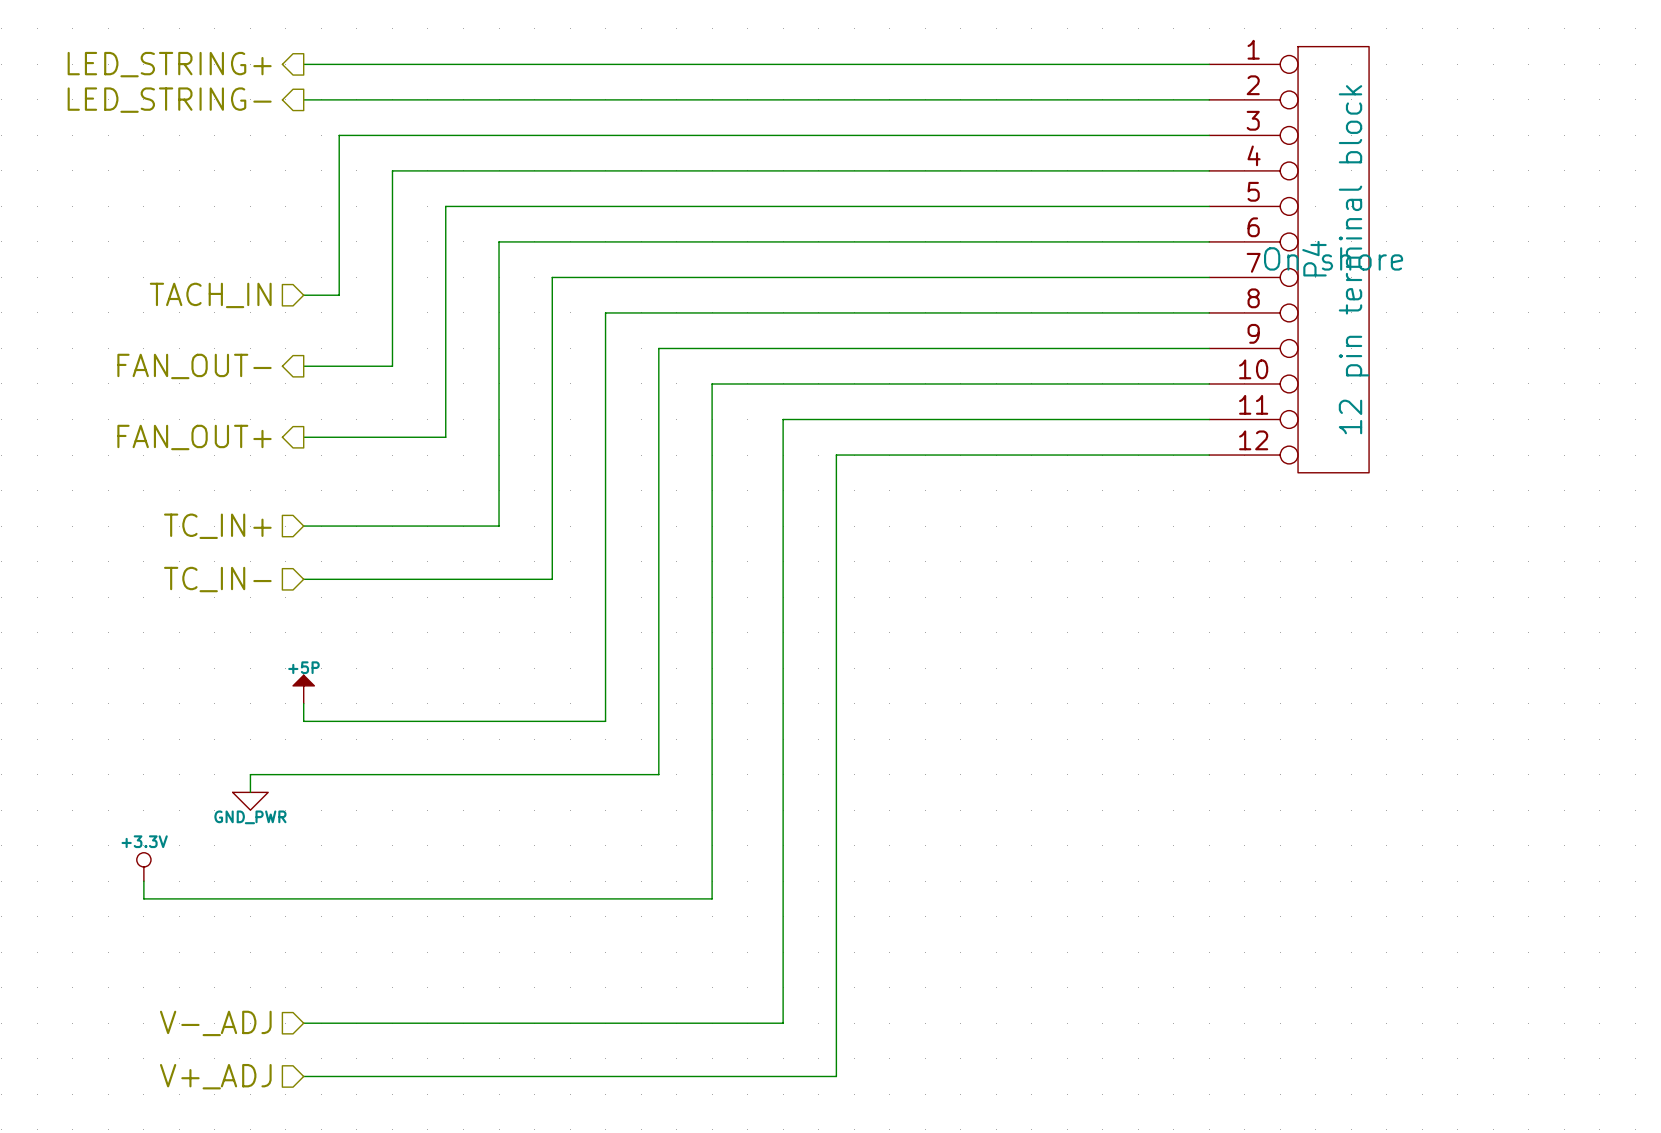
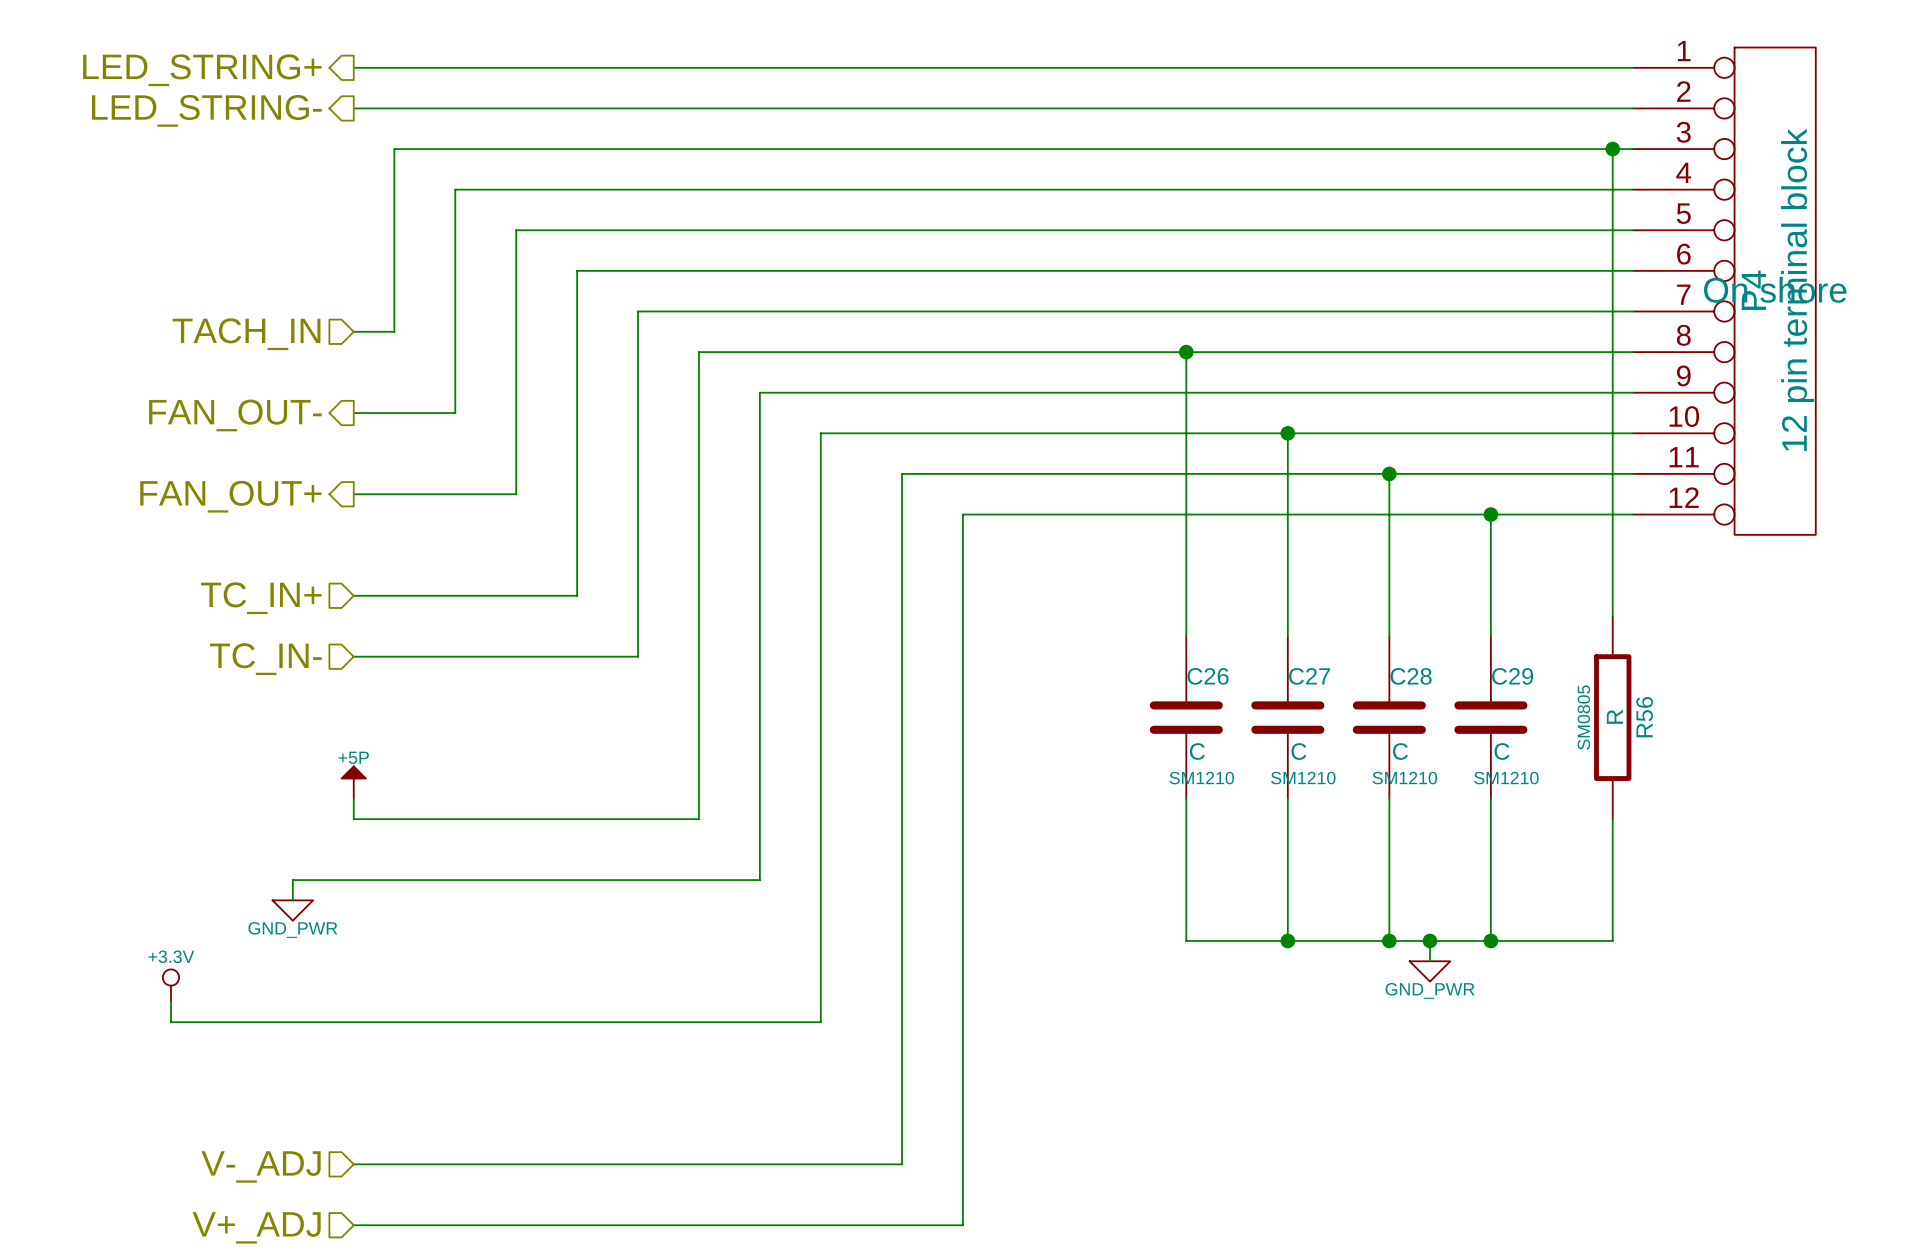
wire: none -> (1389, 67) (1633, 67)
wire: none -> (1389, 108) (1633, 108)
wire: none -> (1389, 149) (1633, 149)
wire: none -> (1612, 149) (1612, 616)
junction: none -> (1612, 149)
wire: none -> (1389, 189) (1633, 189)
wire: none -> (1389, 230) (1633, 230)
wire: none -> (1389, 270) (1633, 270)
P4 position: (1289, 259) -> (1724, 291)
wire: none -> (1389, 311) (1633, 311)
wire: none -> (1186, 352) (1186, 636)
junction: none -> (1186, 352)
wire: none -> (1389, 352) (1633, 352)
wire: none -> (1389, 392) (1633, 392)
wire: none -> (1287, 433) (1287, 636)
junction: none -> (1287, 433)
wire: none -> (1389, 433) (1633, 433)
junction: none -> (1389, 473)
wire: none -> (1633, 473) (1389, 473) (1389, 636)
wire: none -> (1389, 514) (1633, 514)
wire: none -> (1490, 514) (1490, 636)
junction: none -> (1490, 514)
C26: none -> C (1186, 717)
C27: none -> C (1287, 717)
C28: none -> C (1389, 717)
C29: none -> C (1490, 717)
R56: none -> R (1612, 717)
wire: none -> (1186, 798) (1186, 940) (1612, 940) (1612, 819)
wire: none -> (1287, 798) (1287, 940)
wire: none -> (1389, 798) (1389, 940)
wire: none -> (1490, 798) (1490, 940)
junction: none -> (1287, 940)
junction: none -> (1389, 940)
wire: none -> (1429, 940) (1429, 961)
junction: none -> (1429, 940)
junction: none -> (1490, 940)
power symbol: none -> GND_PWR (1429, 971)

